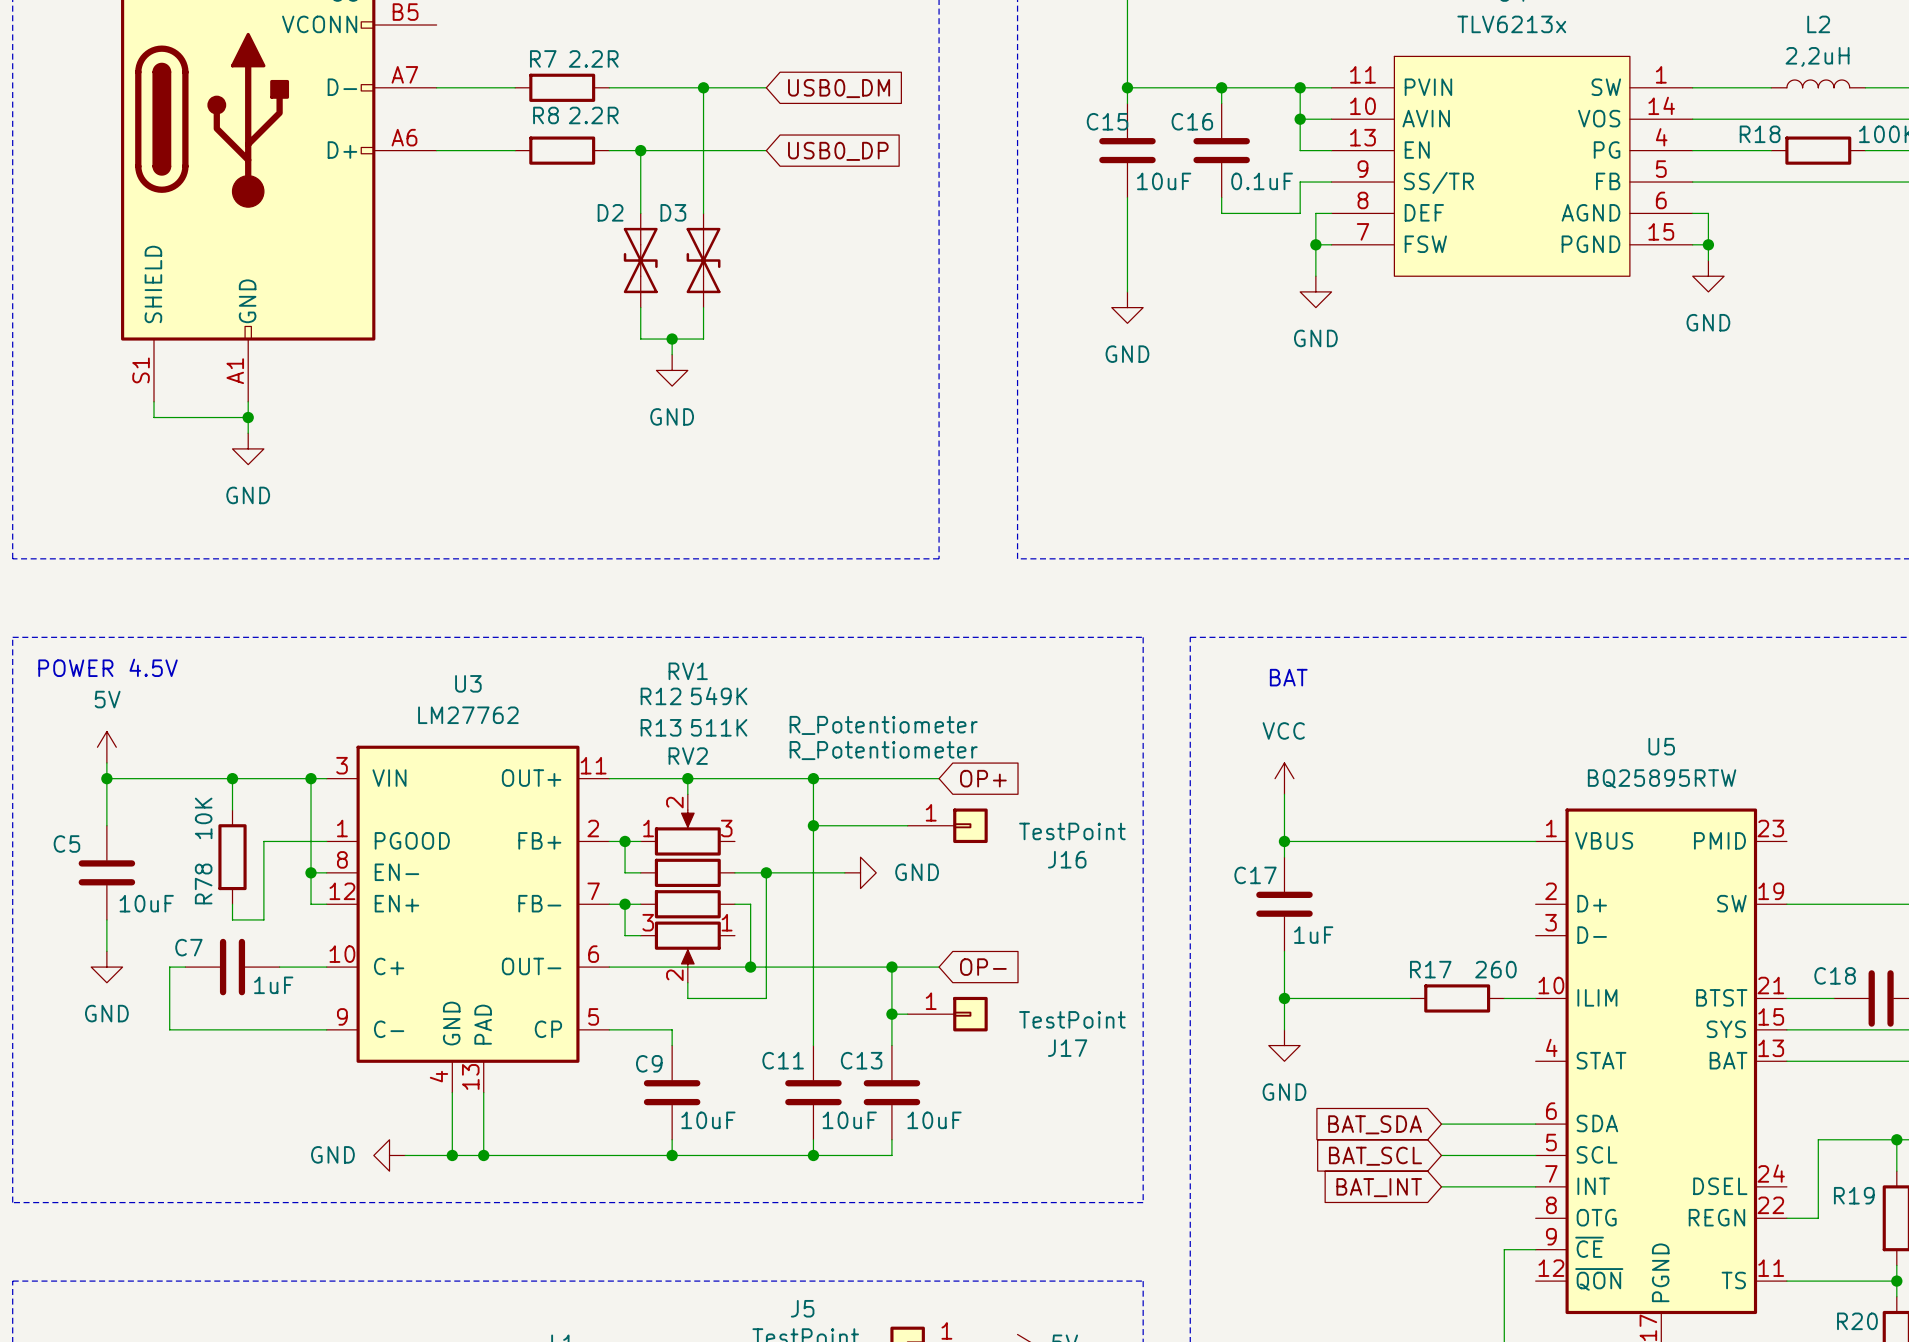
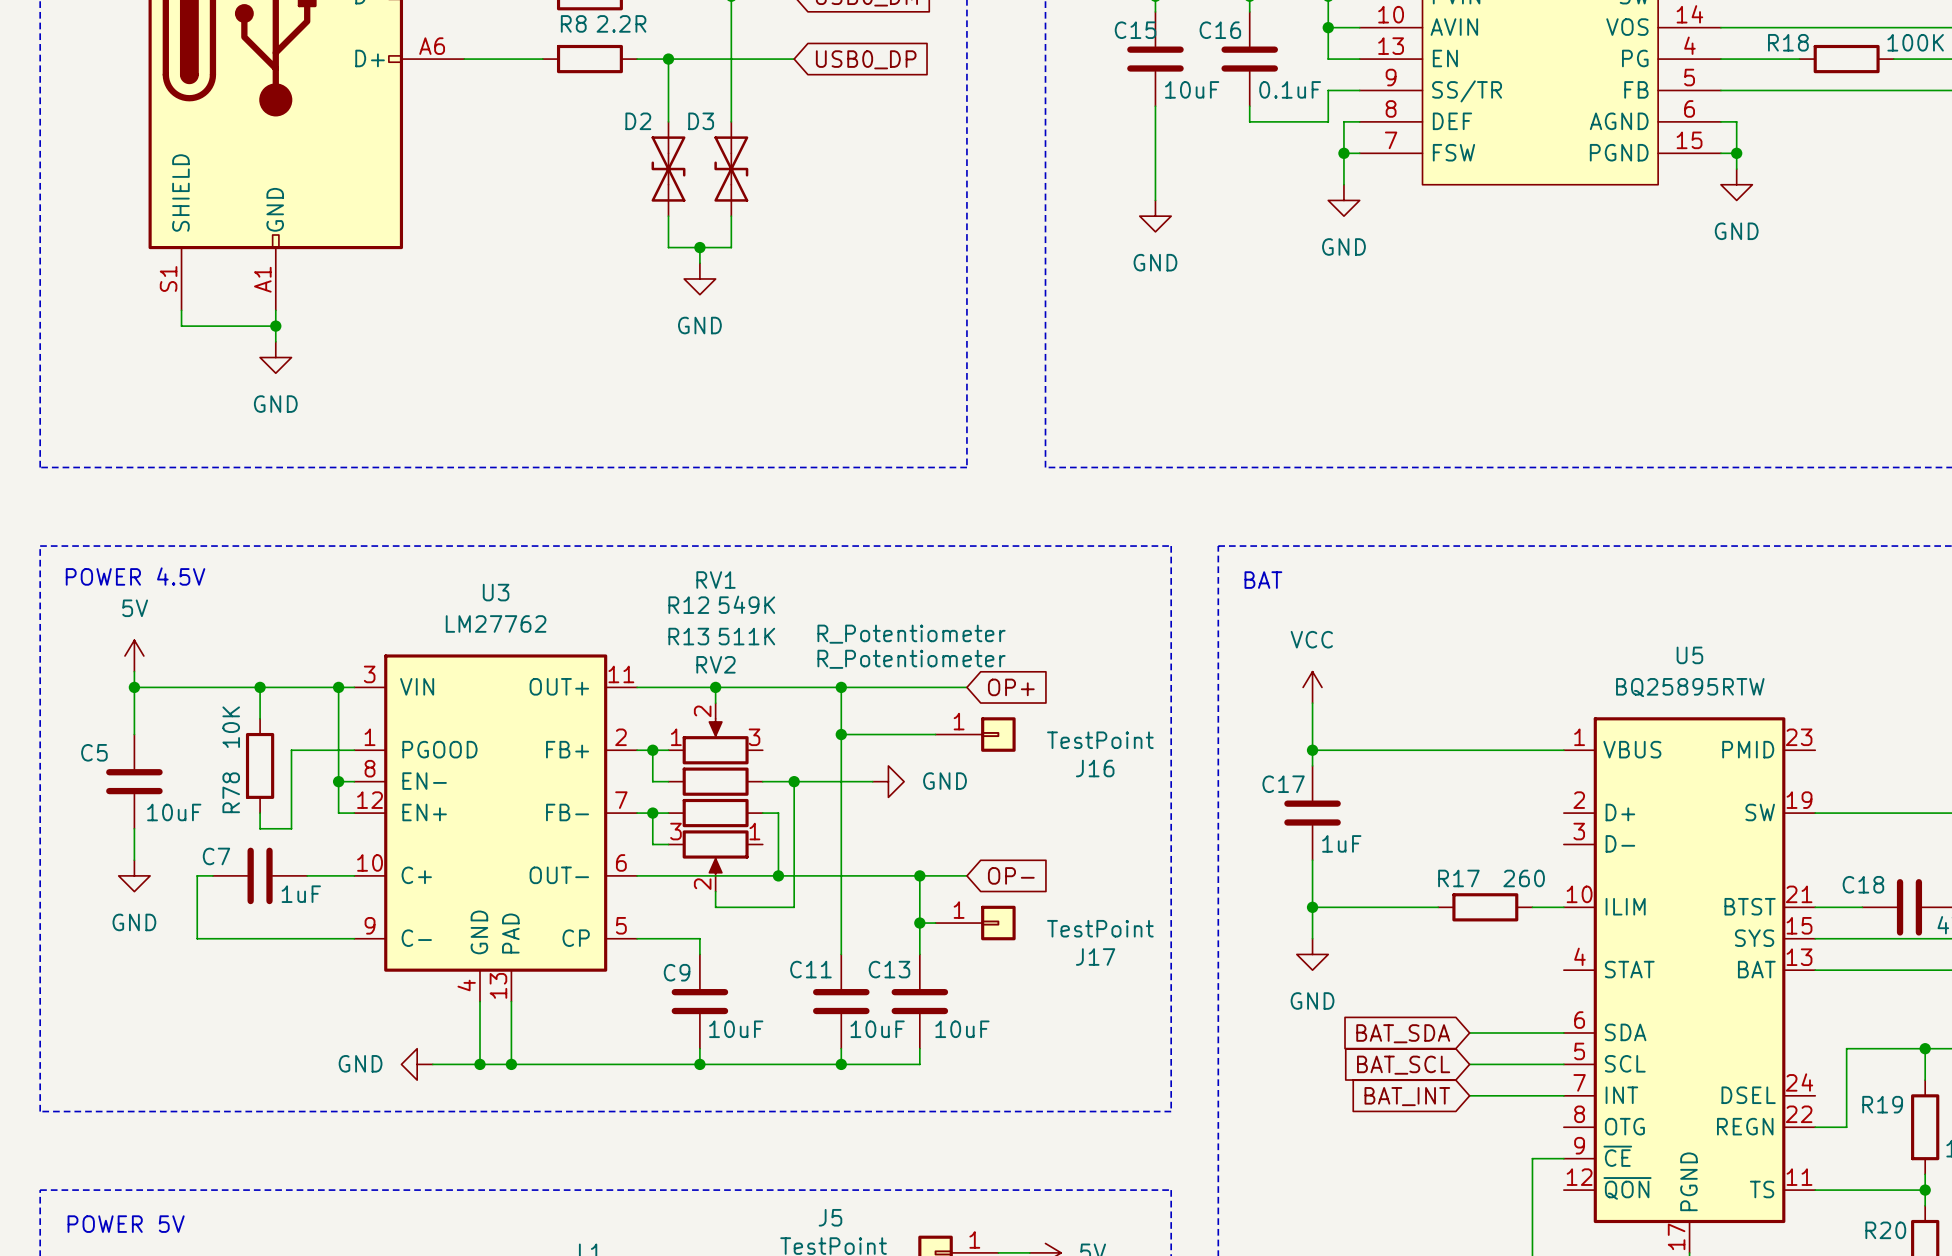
text position: BAT (1288, 677) -> BAT (1263, 580)
text: none -> POWER 5V (126, 1224)

